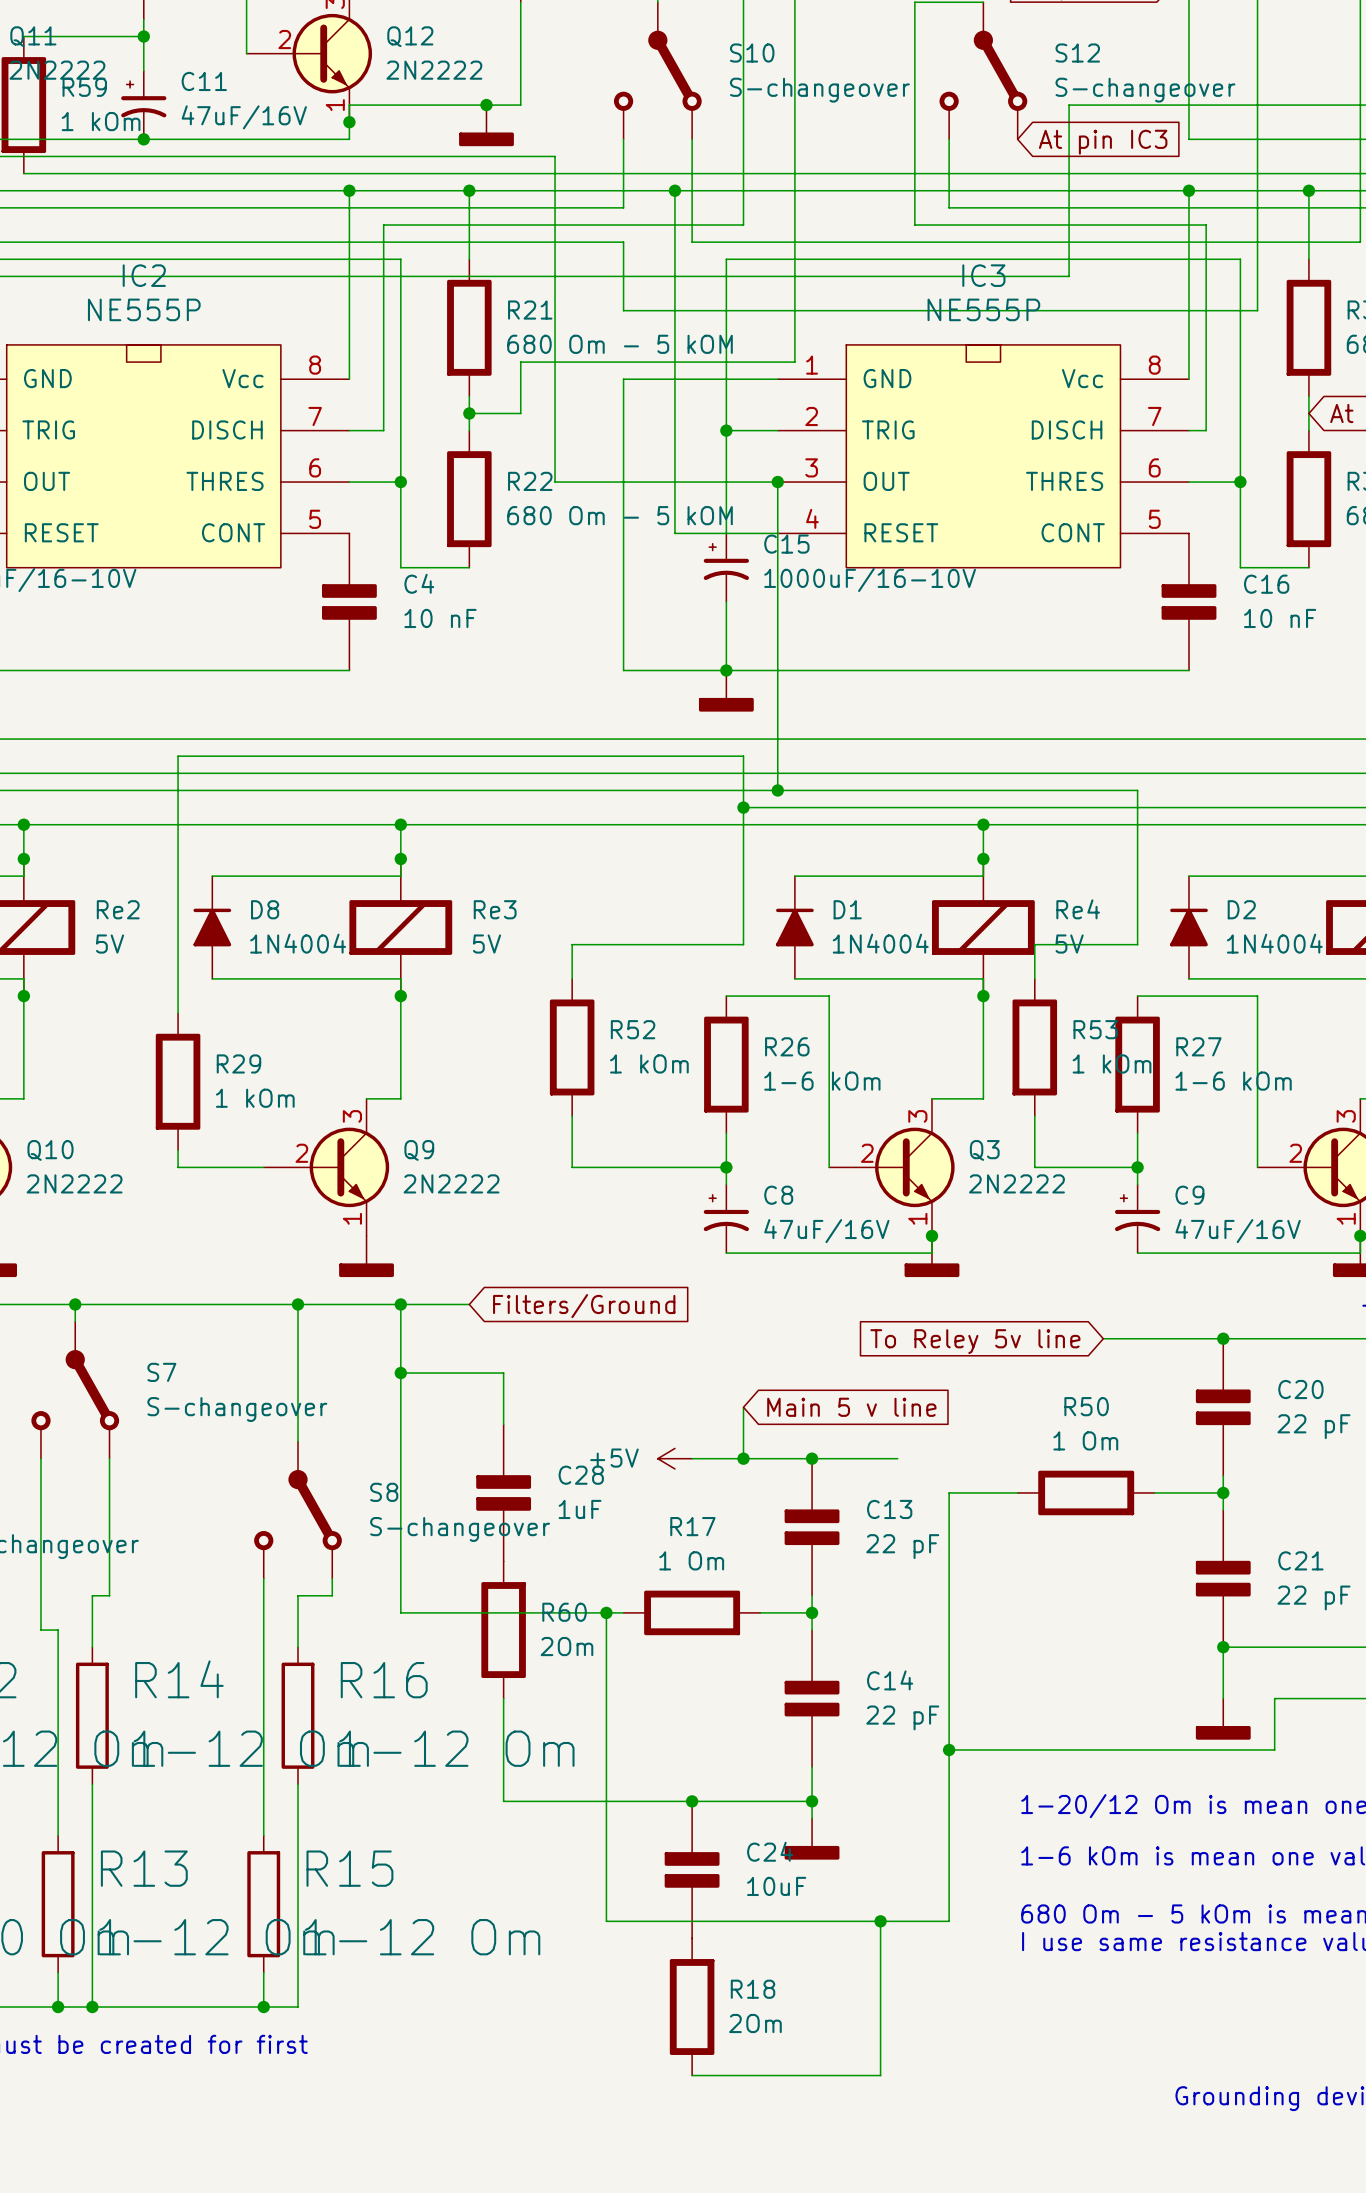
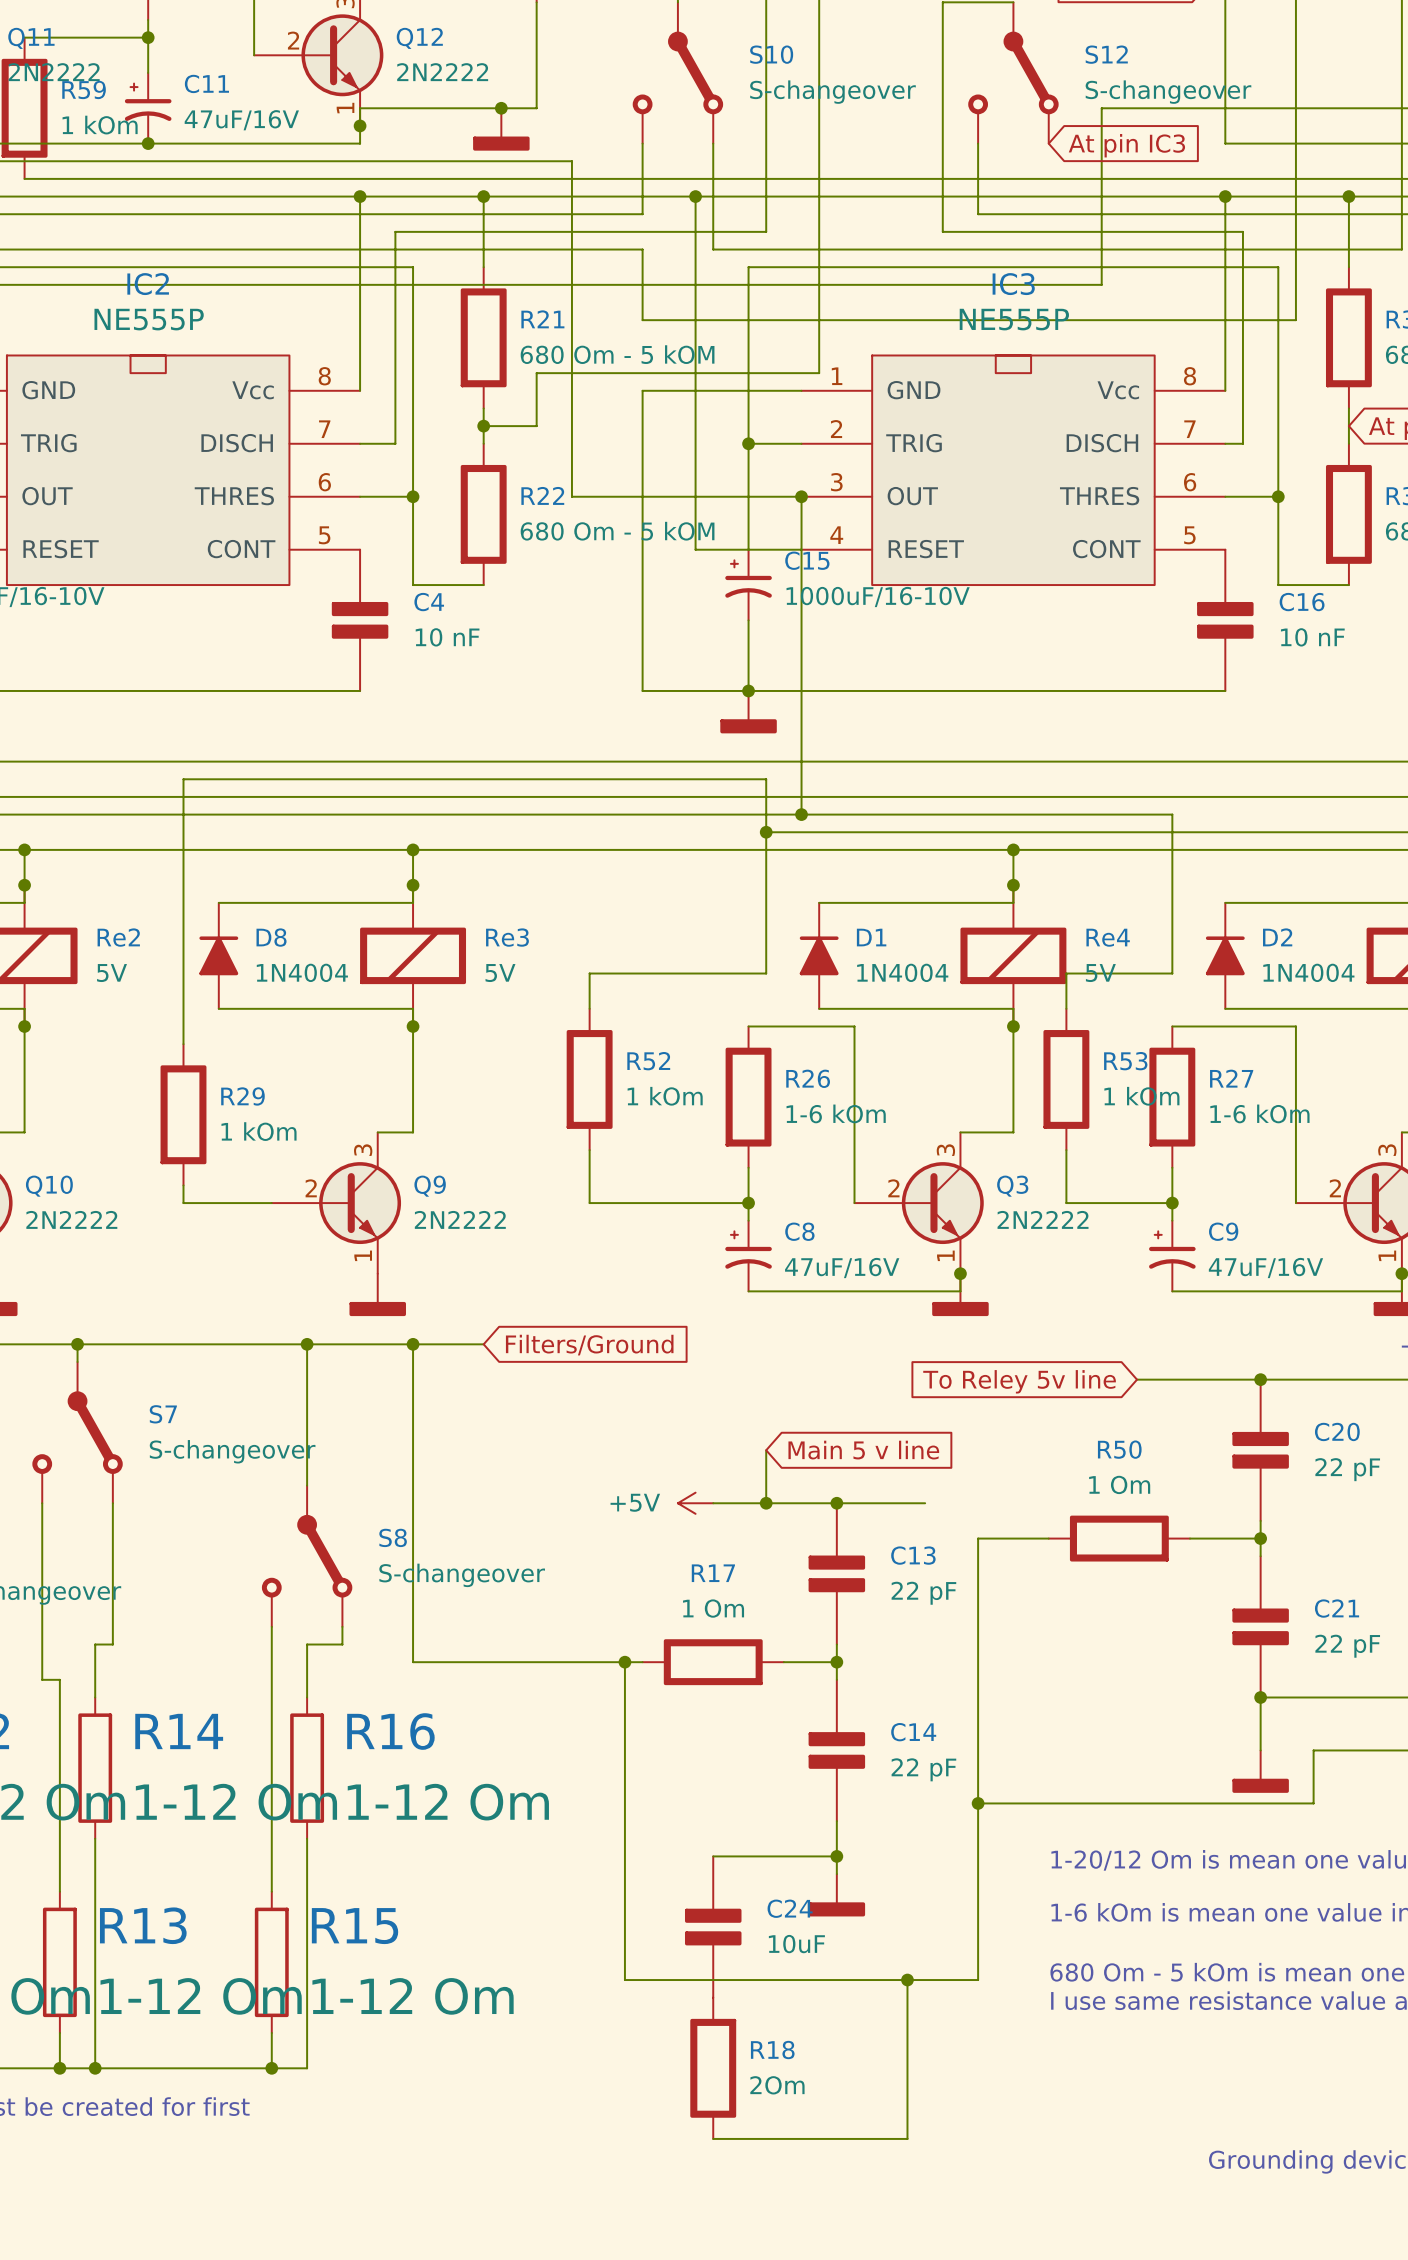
wire: (400, 1373) (503, 1373) (503, 1424) -> none
junction: (400, 1373) -> none
C28: 1uF (503, 1492) -> none
R60: 2Om (503, 1630) -> none
wire: (503, 1698) (503, 1801) (692, 1801) -> none
junction: (692, 1801) -> none

